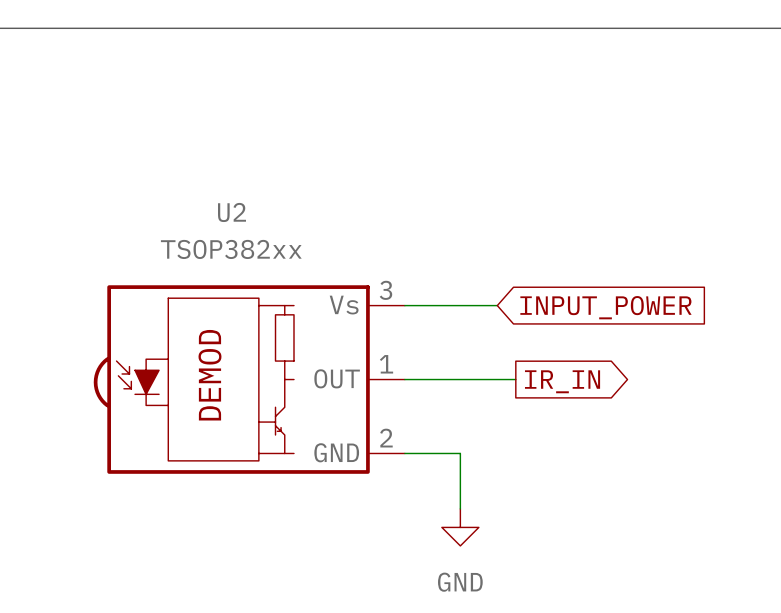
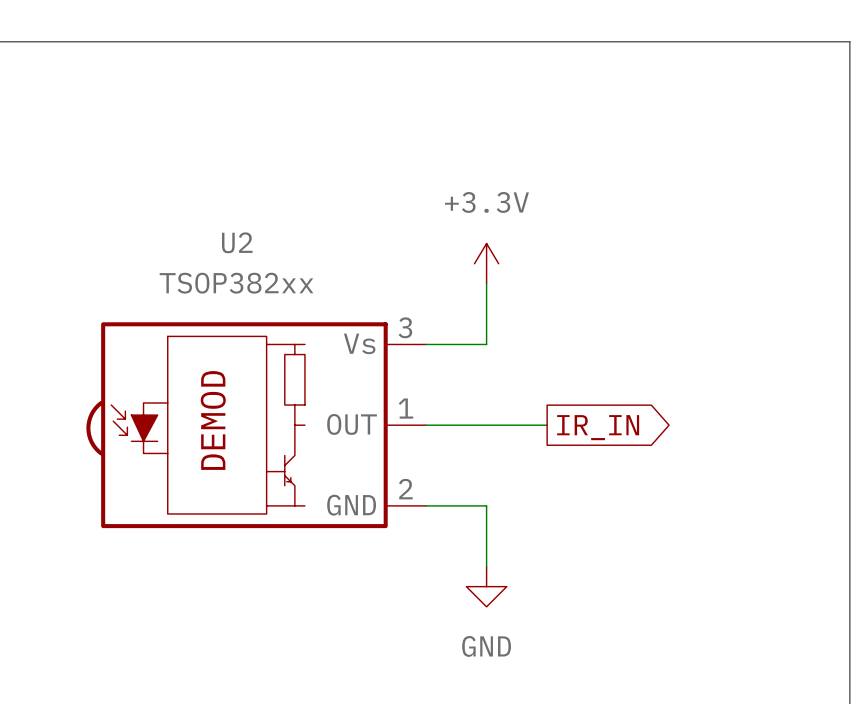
power symbol: none -> +3.3V (486, 263)
wire: (460, 305) (497, 305) -> (486, 344) (486, 283)
global label: INPUT_POWER (605, 307) -> none

